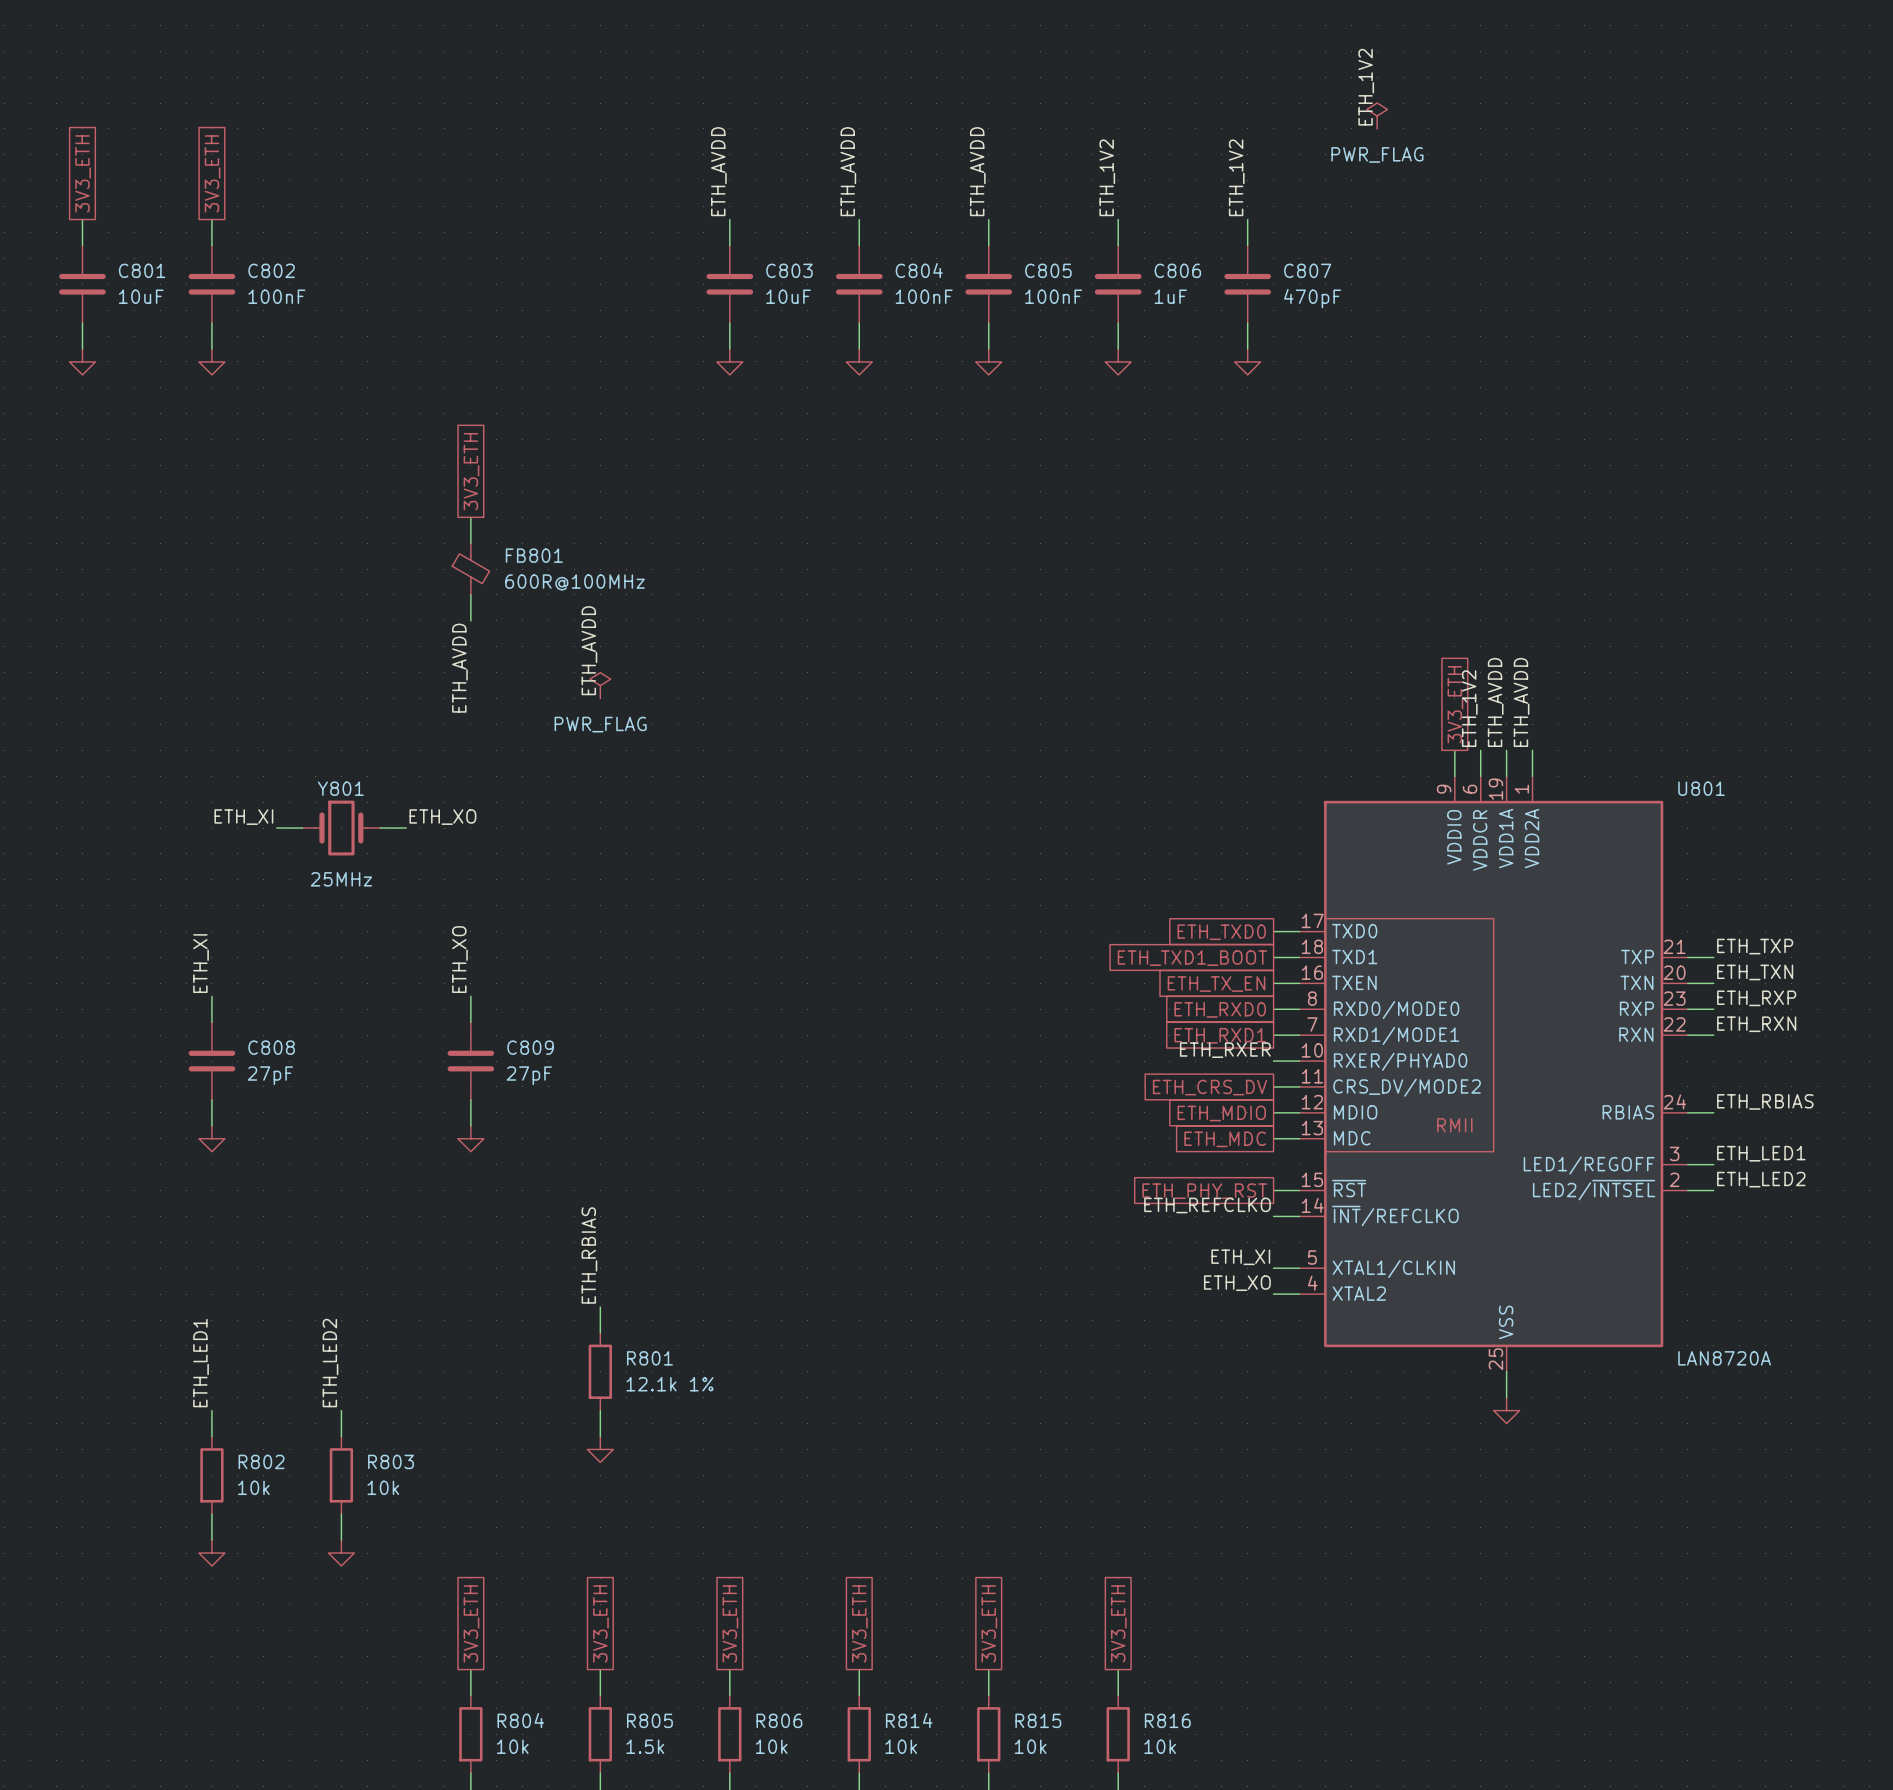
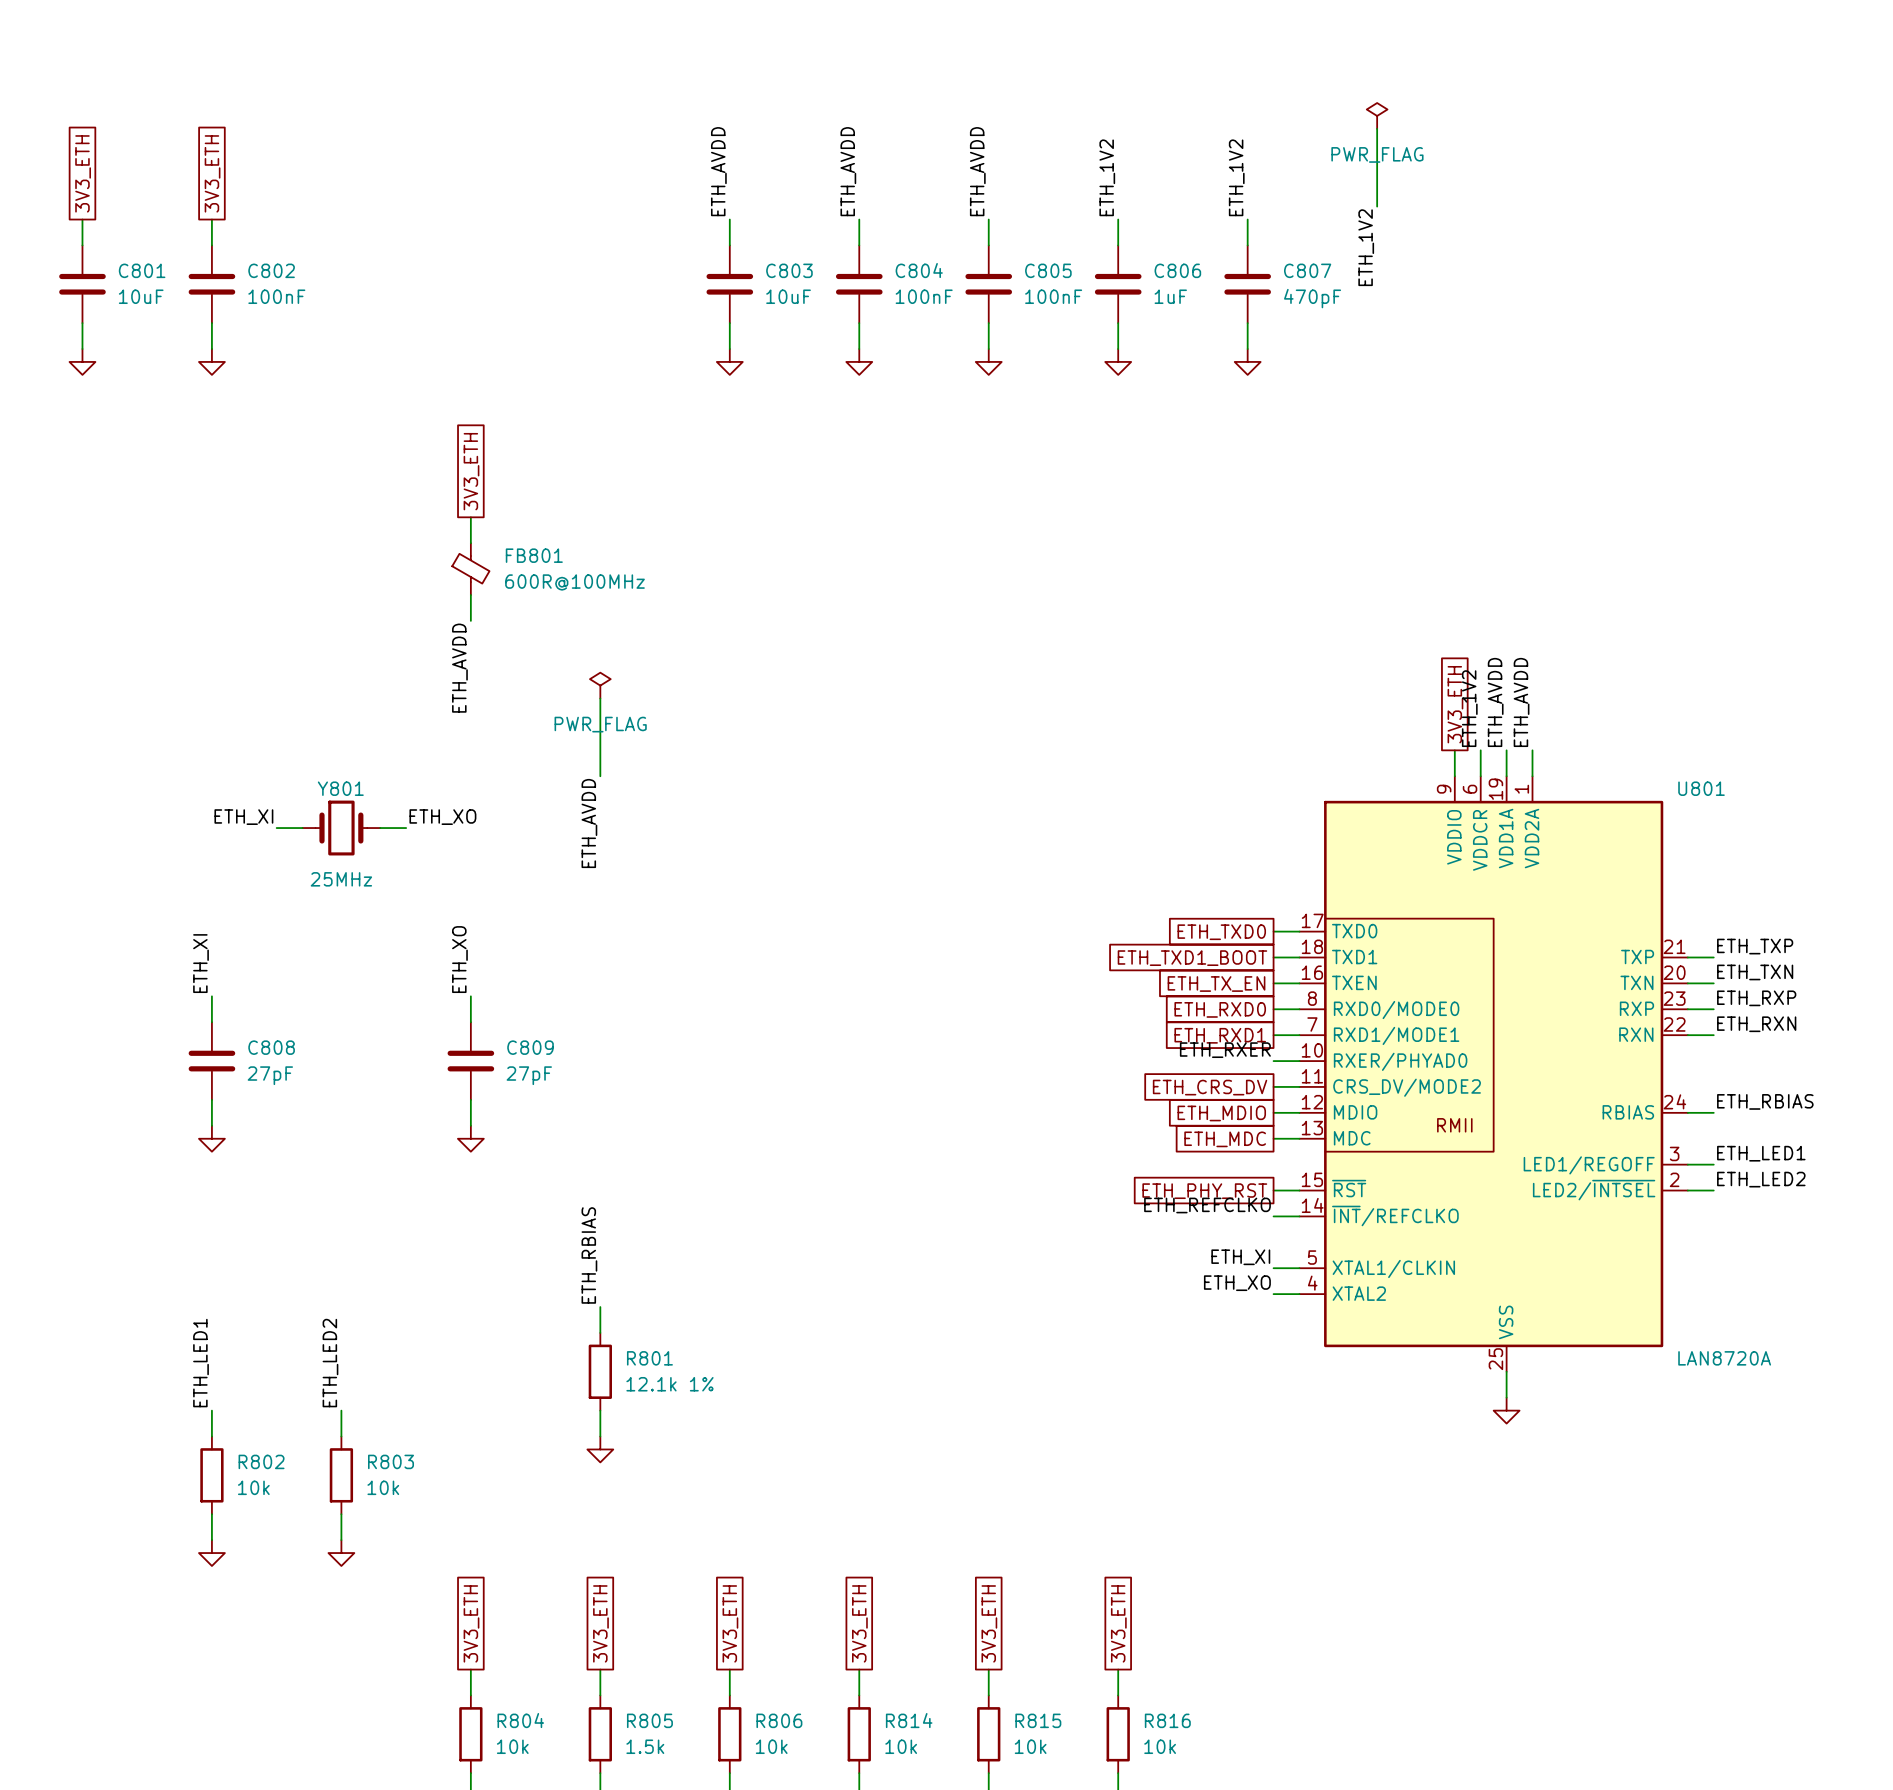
label position: ETH_1V2 (1366, 87) -> ETH_1V2 (1366, 247)
wire: none -> (1377, 128) (1377, 206)
label position: ETH_AVDD (589, 650) -> ETH_AVDD (589, 823)
wire: none -> (600, 698) (600, 776)

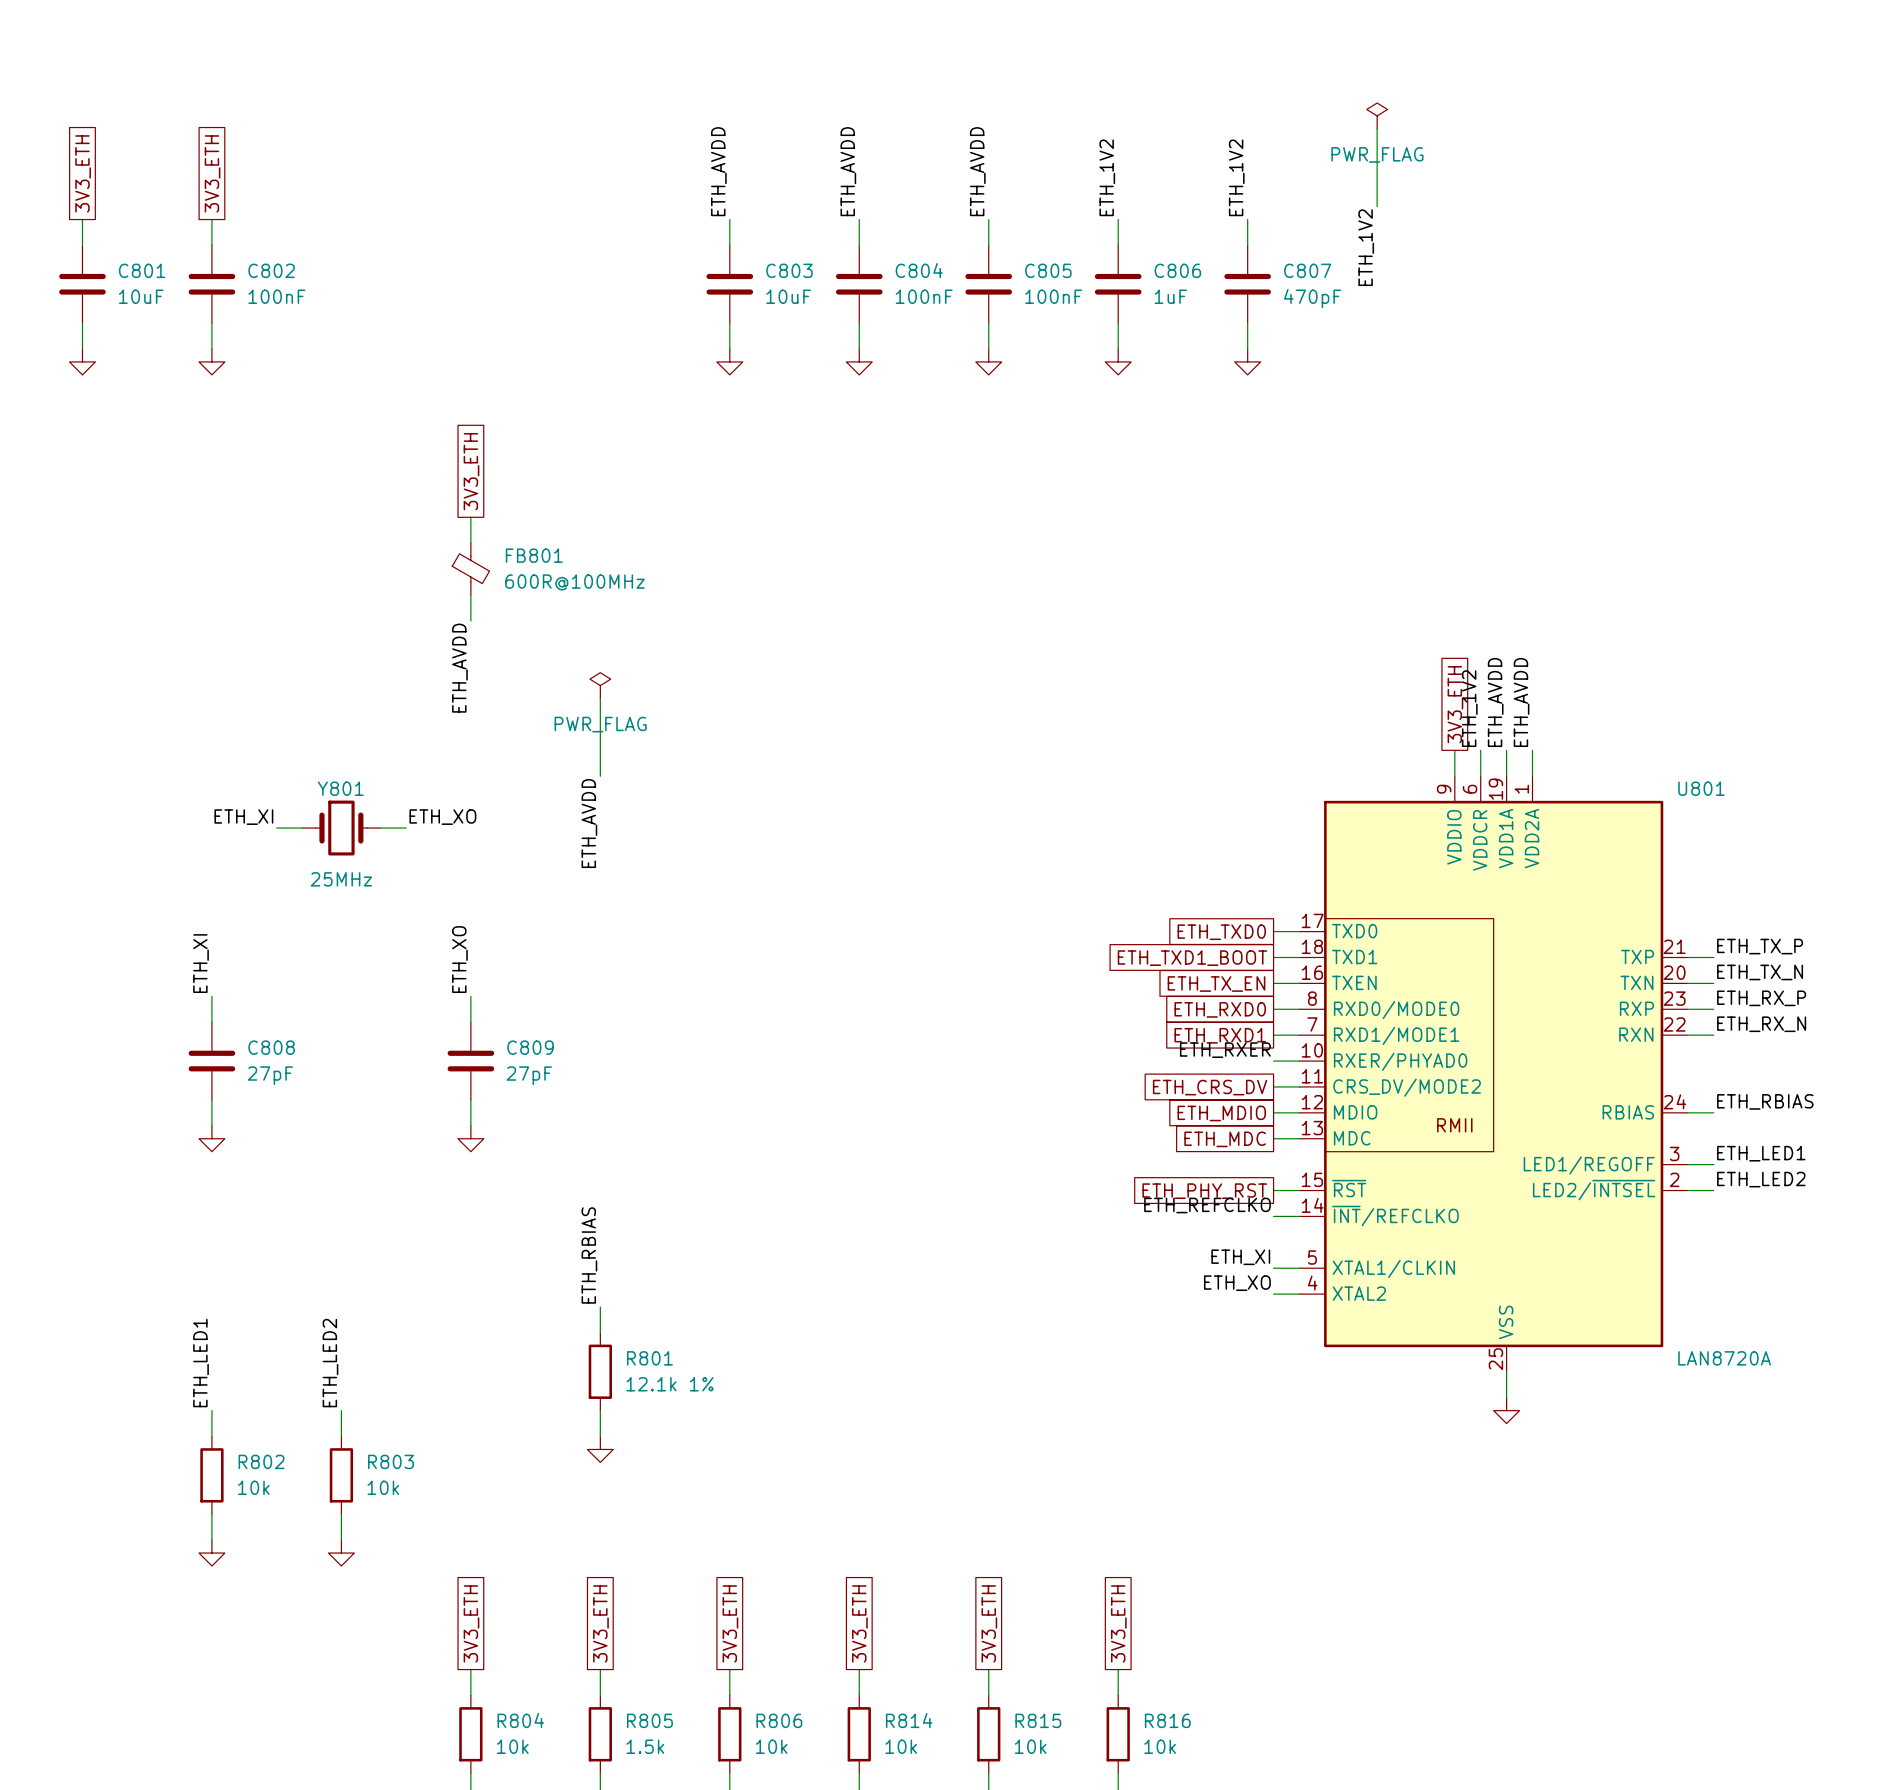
label: ETH_TXP (1755, 946) -> ETH_TX_P (1760, 946)
label: ETH_TXN (1755, 972) -> ETH_TX_N (1760, 972)
label: ETH_RXP (1756, 998) -> ETH_RX_P (1761, 998)
label: ETH_RXN (1756, 1024) -> ETH_RX_N (1761, 1024)

